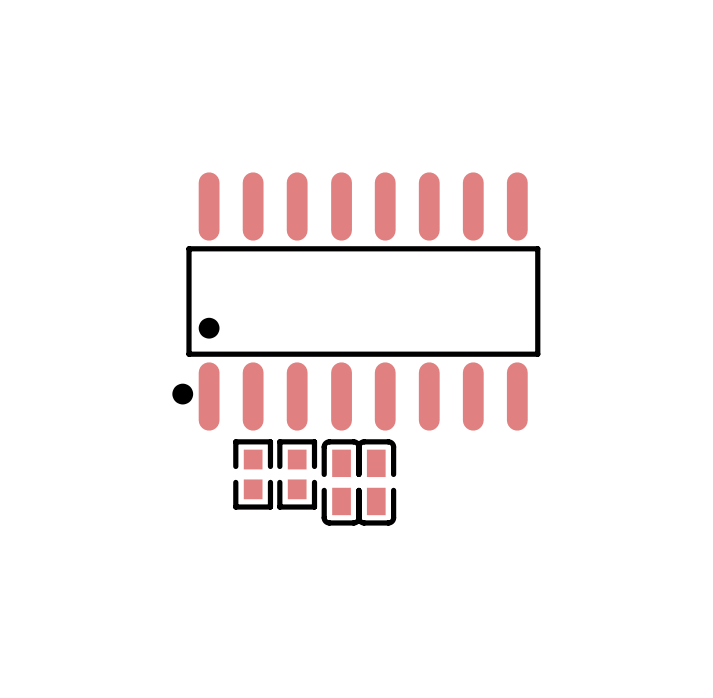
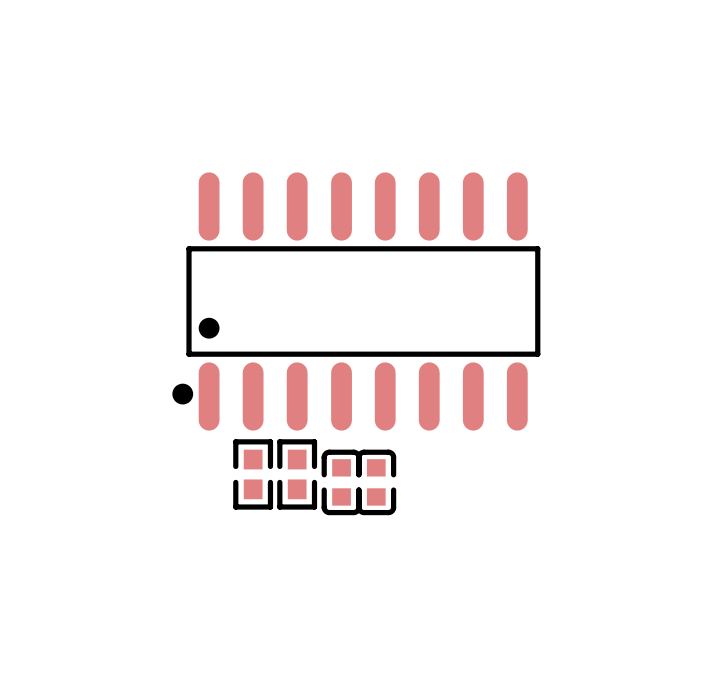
part footprint: [321, 439, 362, 526] -> [321, 449, 362, 516]
part footprint: [356, 439, 397, 526] -> [356, 449, 397, 516]

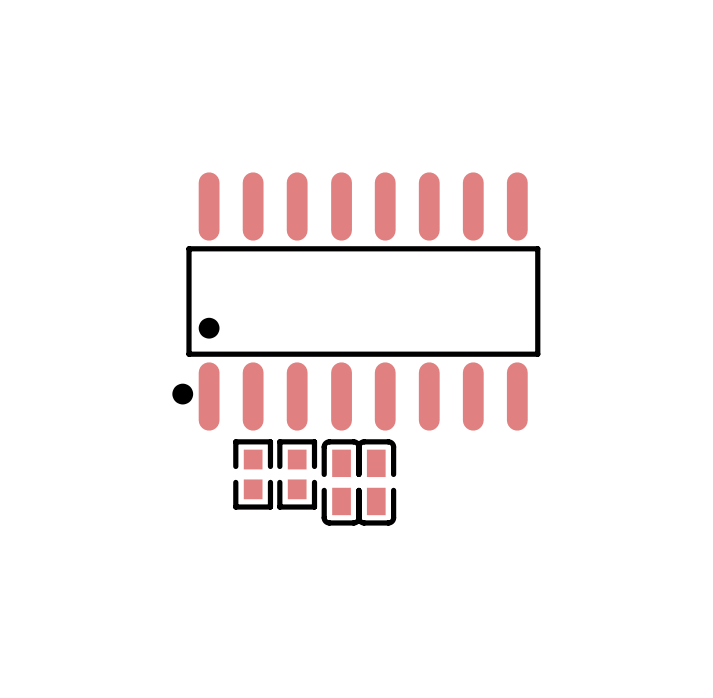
part footprint: [321, 449, 362, 516] -> [321, 439, 362, 526]
part footprint: [356, 449, 397, 516] -> [356, 439, 397, 526]

